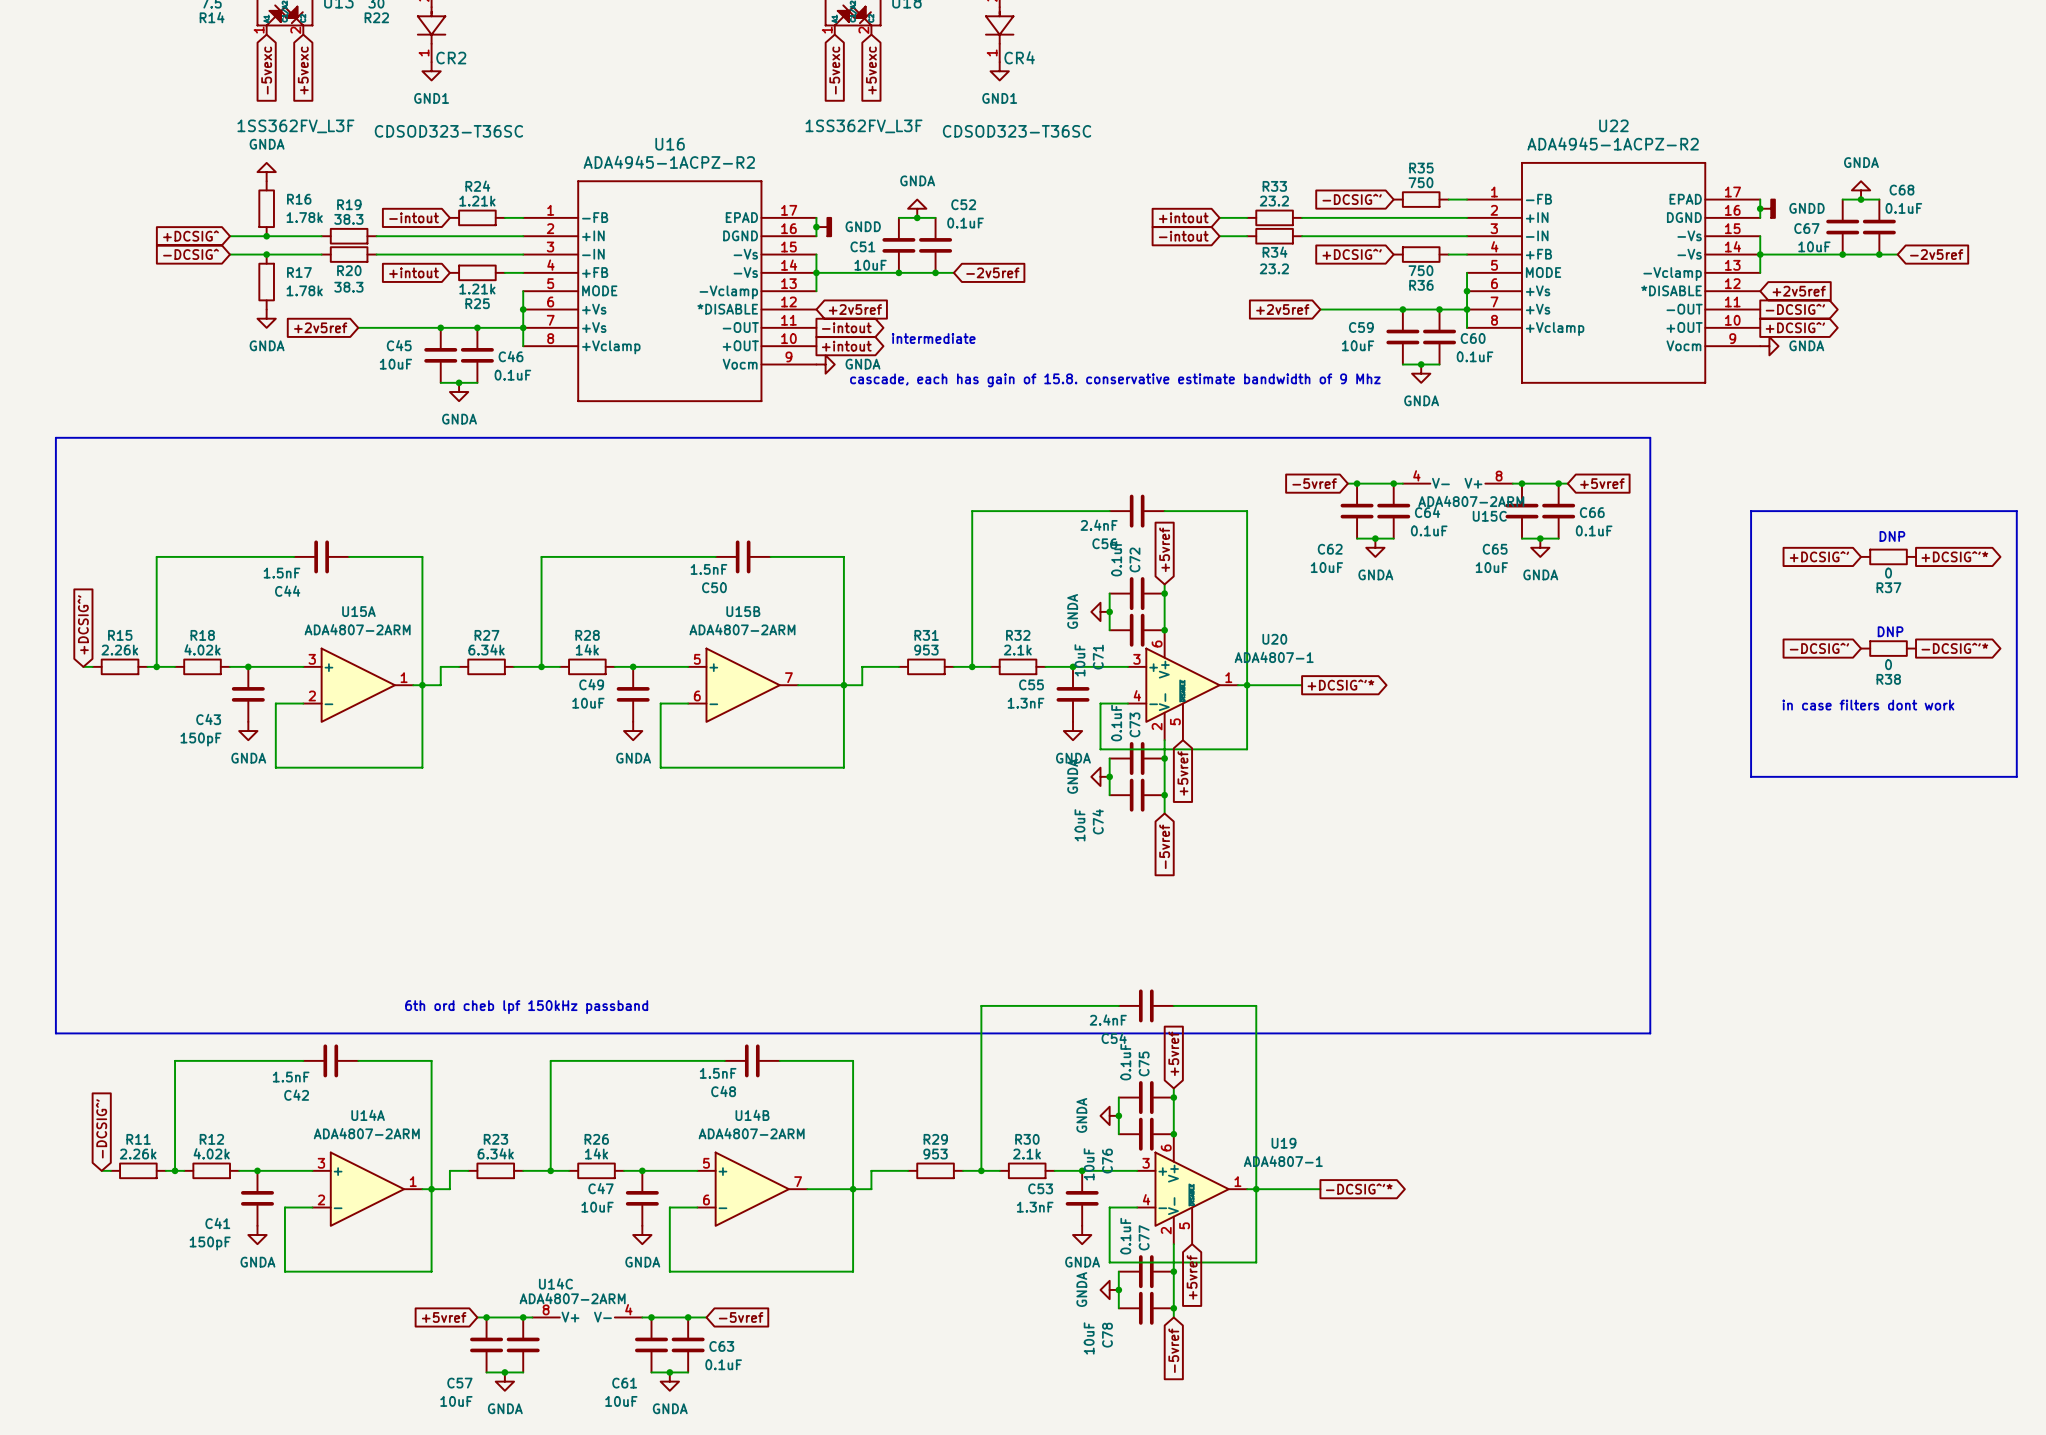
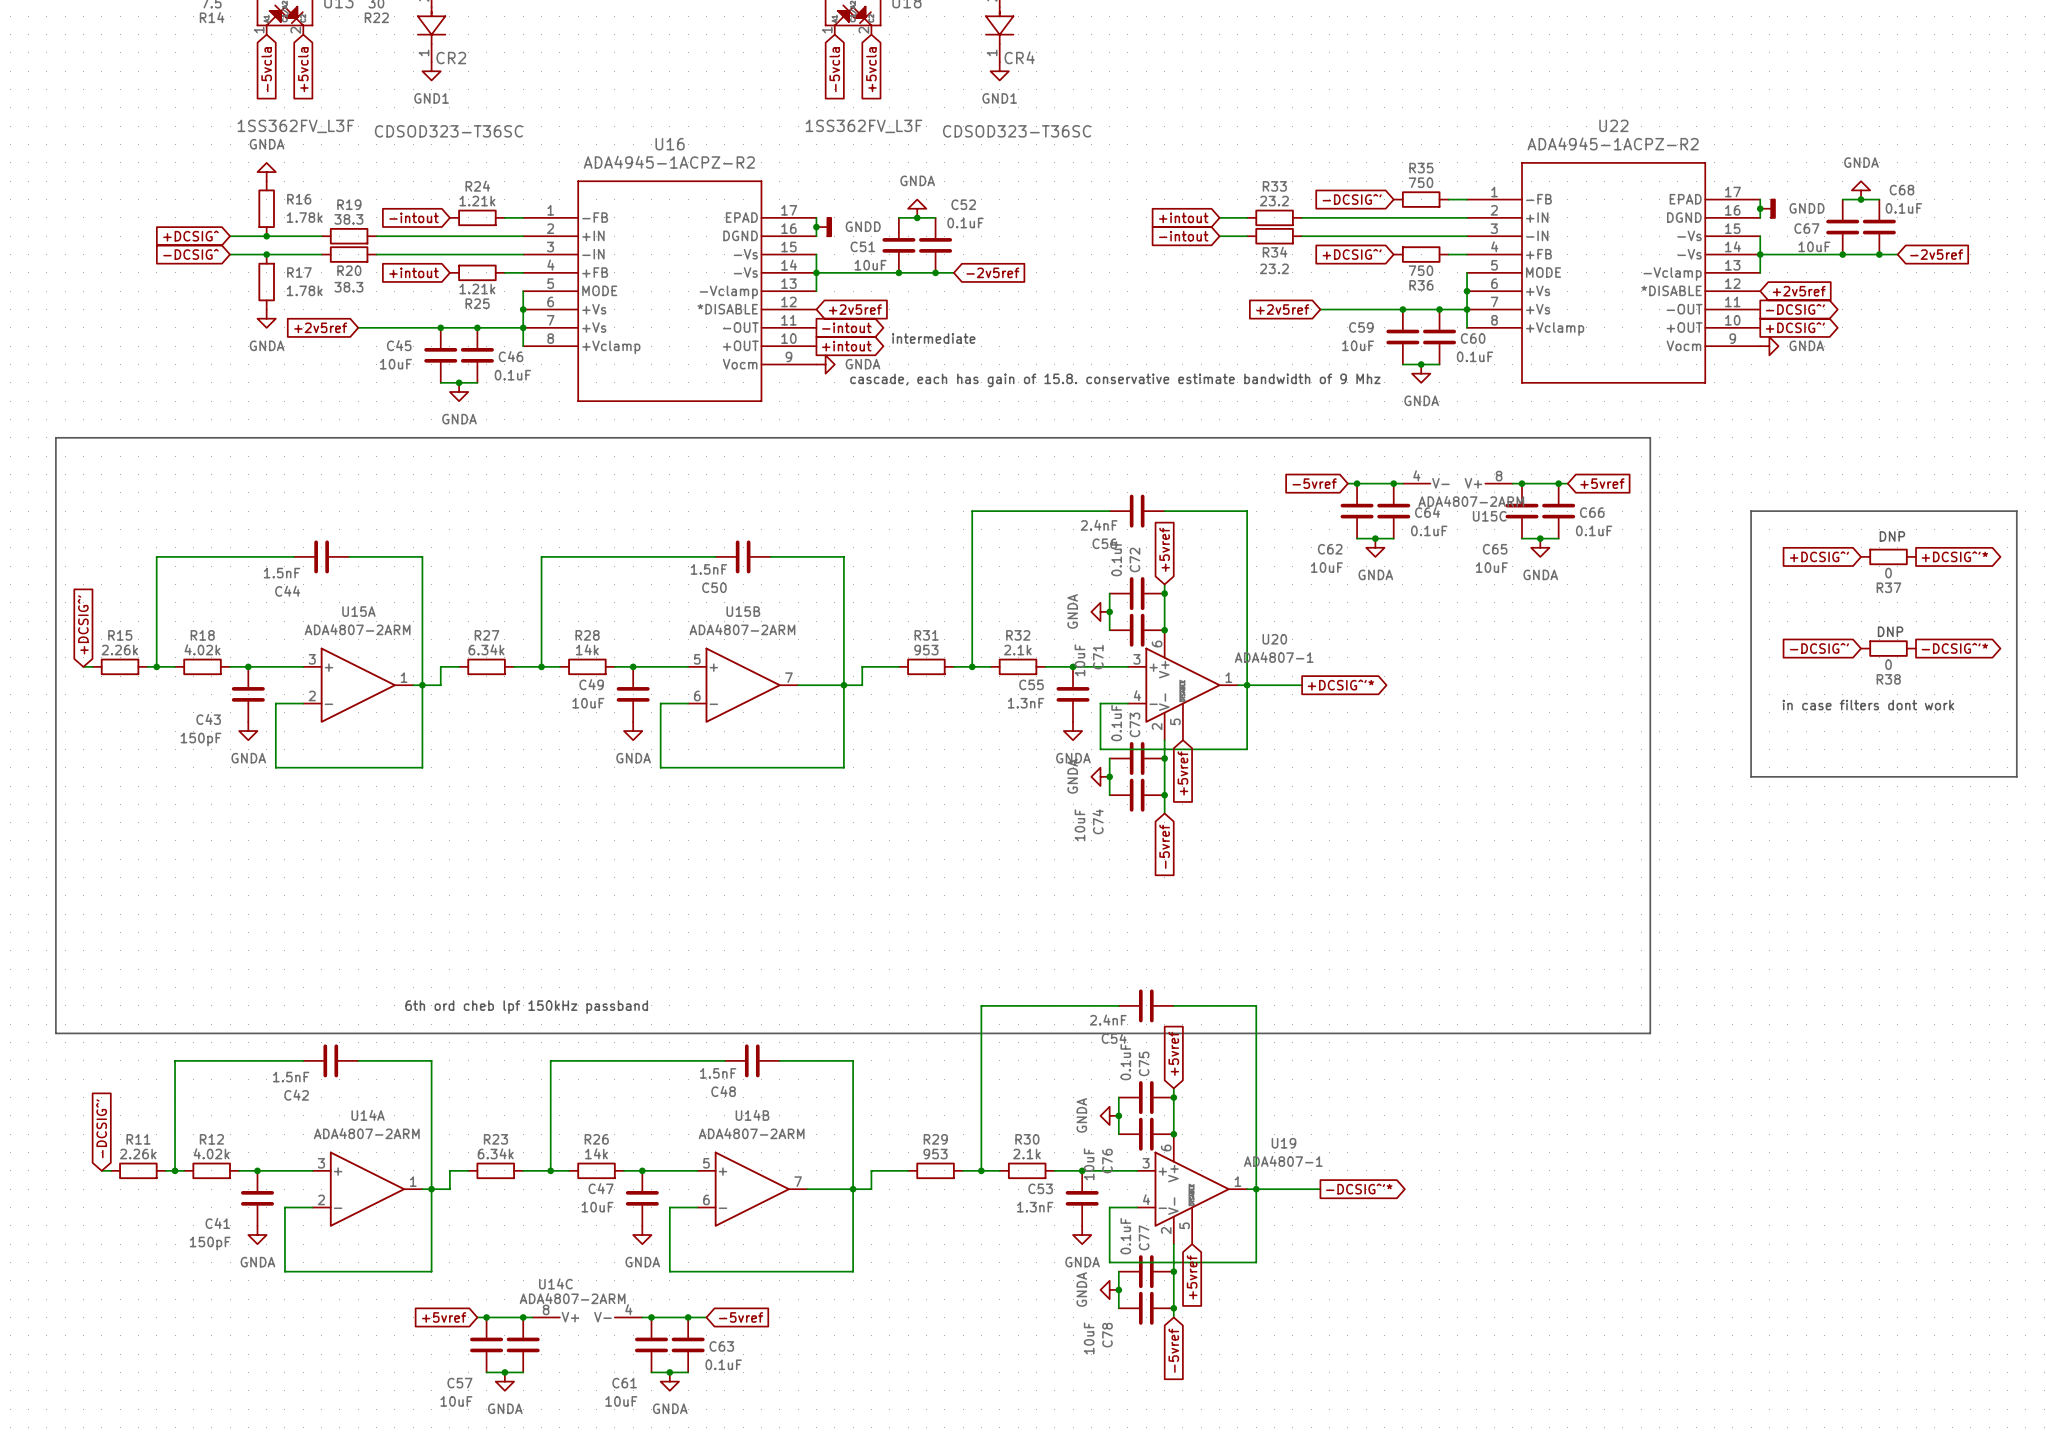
global label: -5vexc (266, 70) -> -5vcla (266, 69)
global label: +5vexc (303, 70) -> +5vcla (303, 69)
global label: -5vexc (834, 70) -> -5vcla (834, 69)
global label: +5vexc (871, 70) -> +5vcla (871, 69)

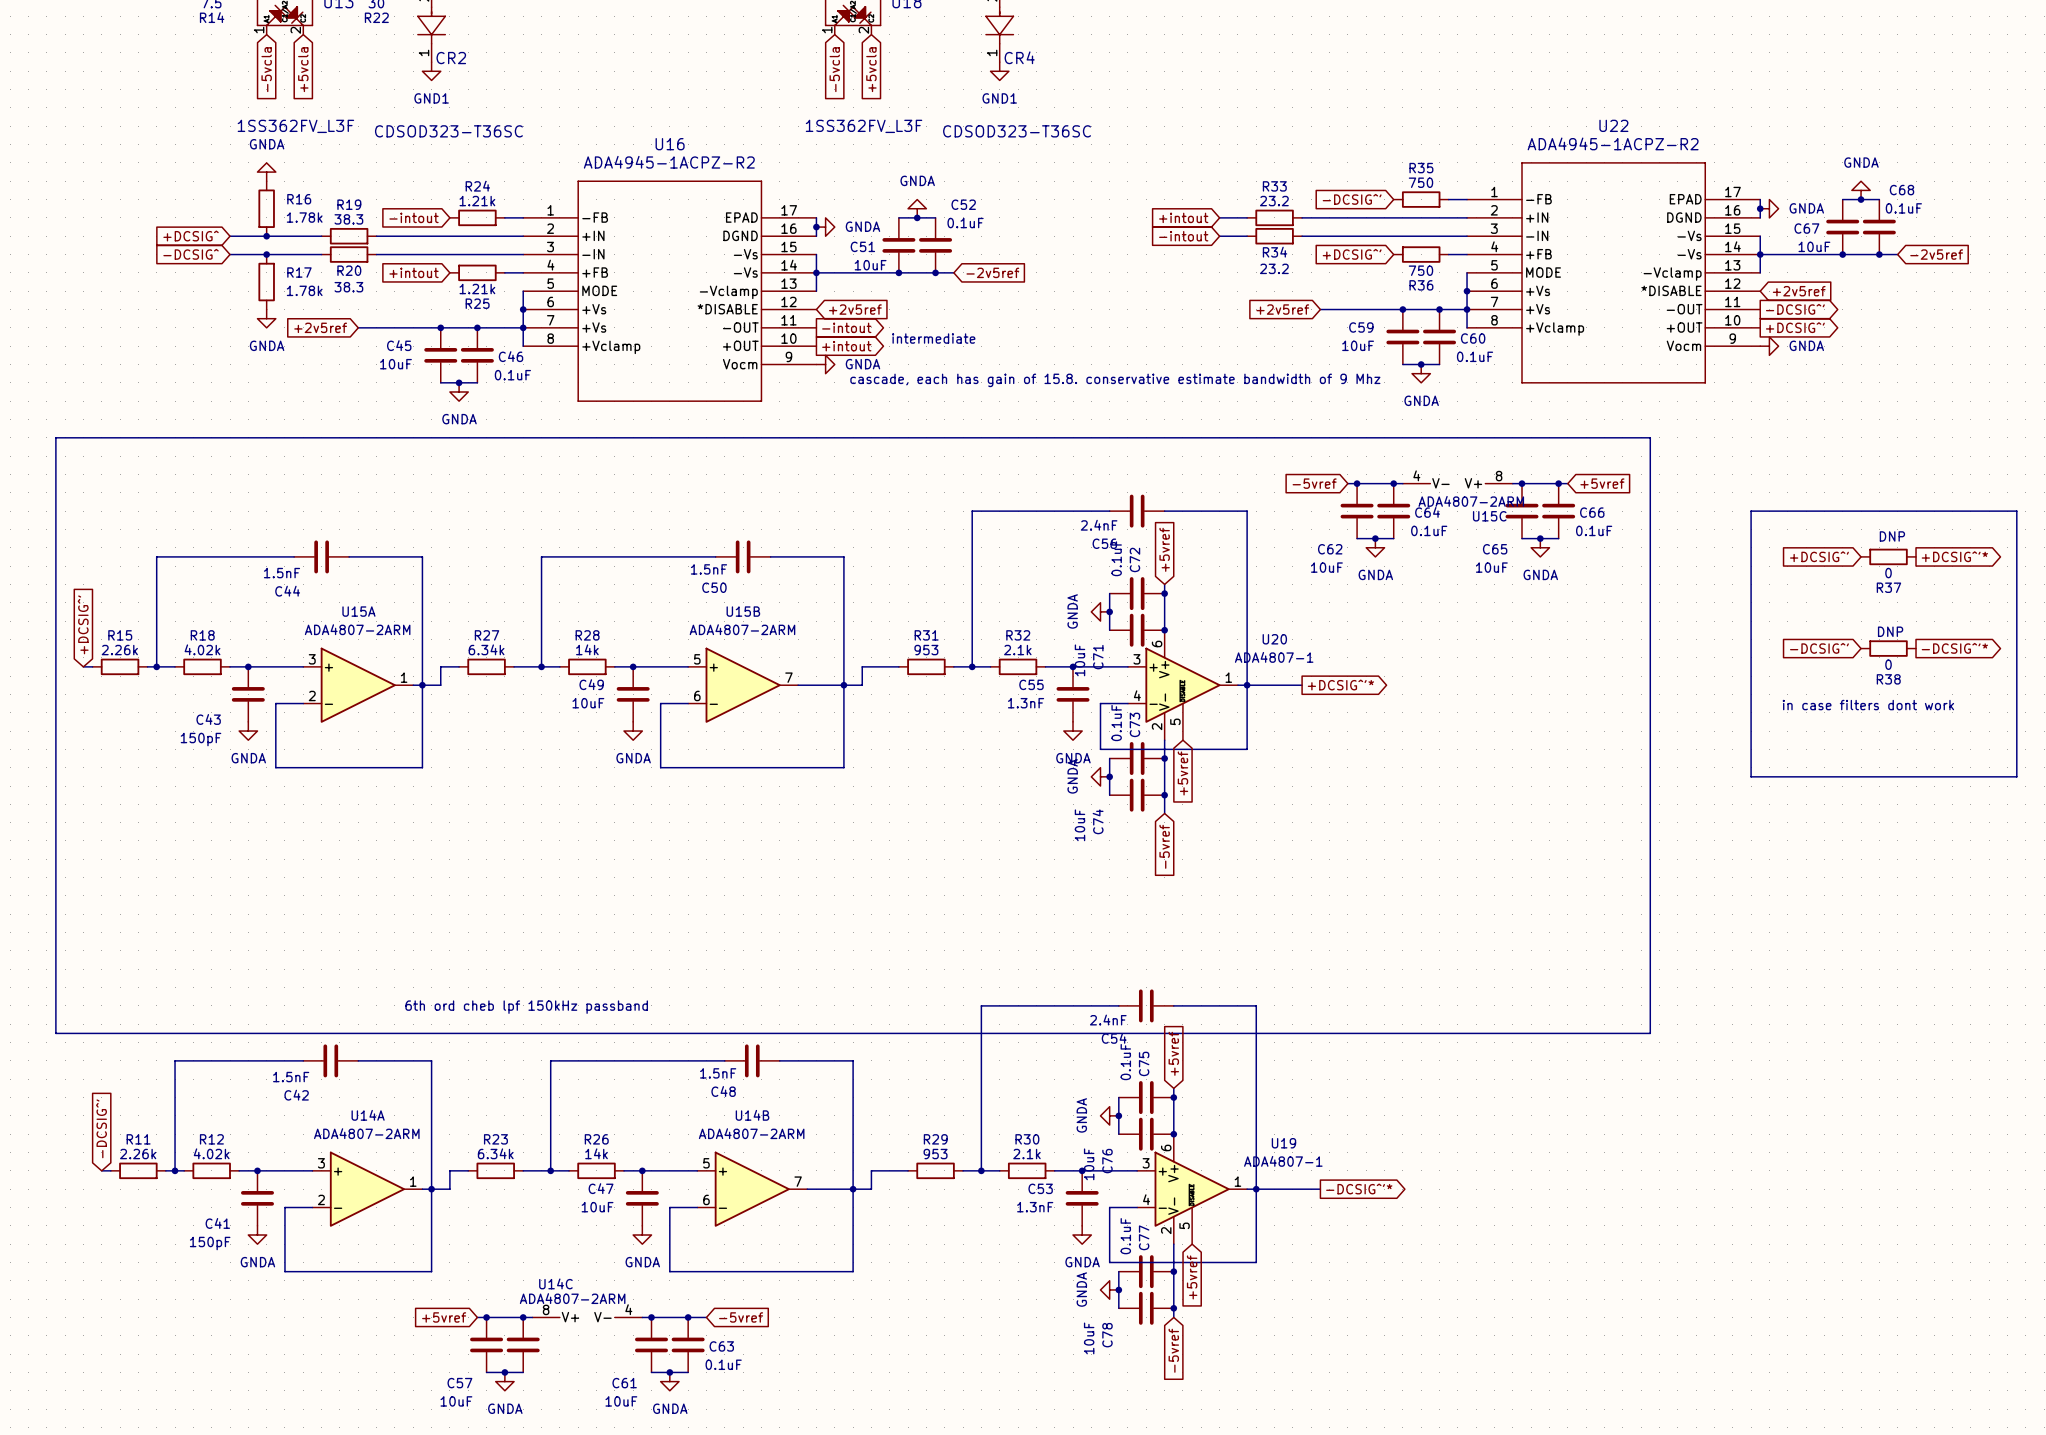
power symbol: GNDD (1768, 208) -> GNDA (1769, 208)
power symbol: GNDD (824, 227) -> GNDA (825, 227)

